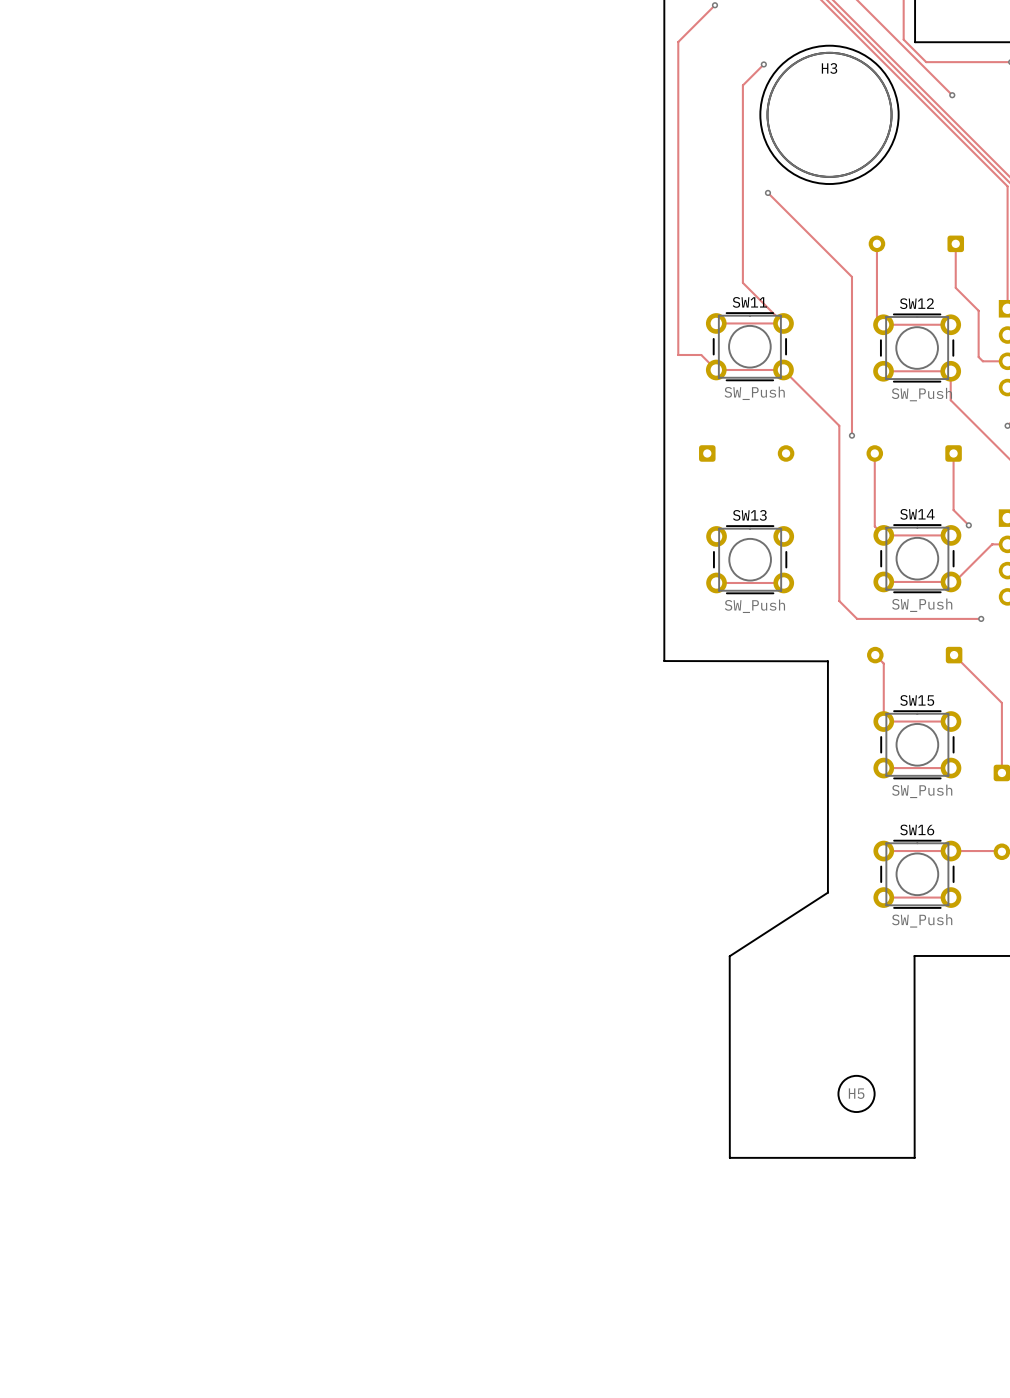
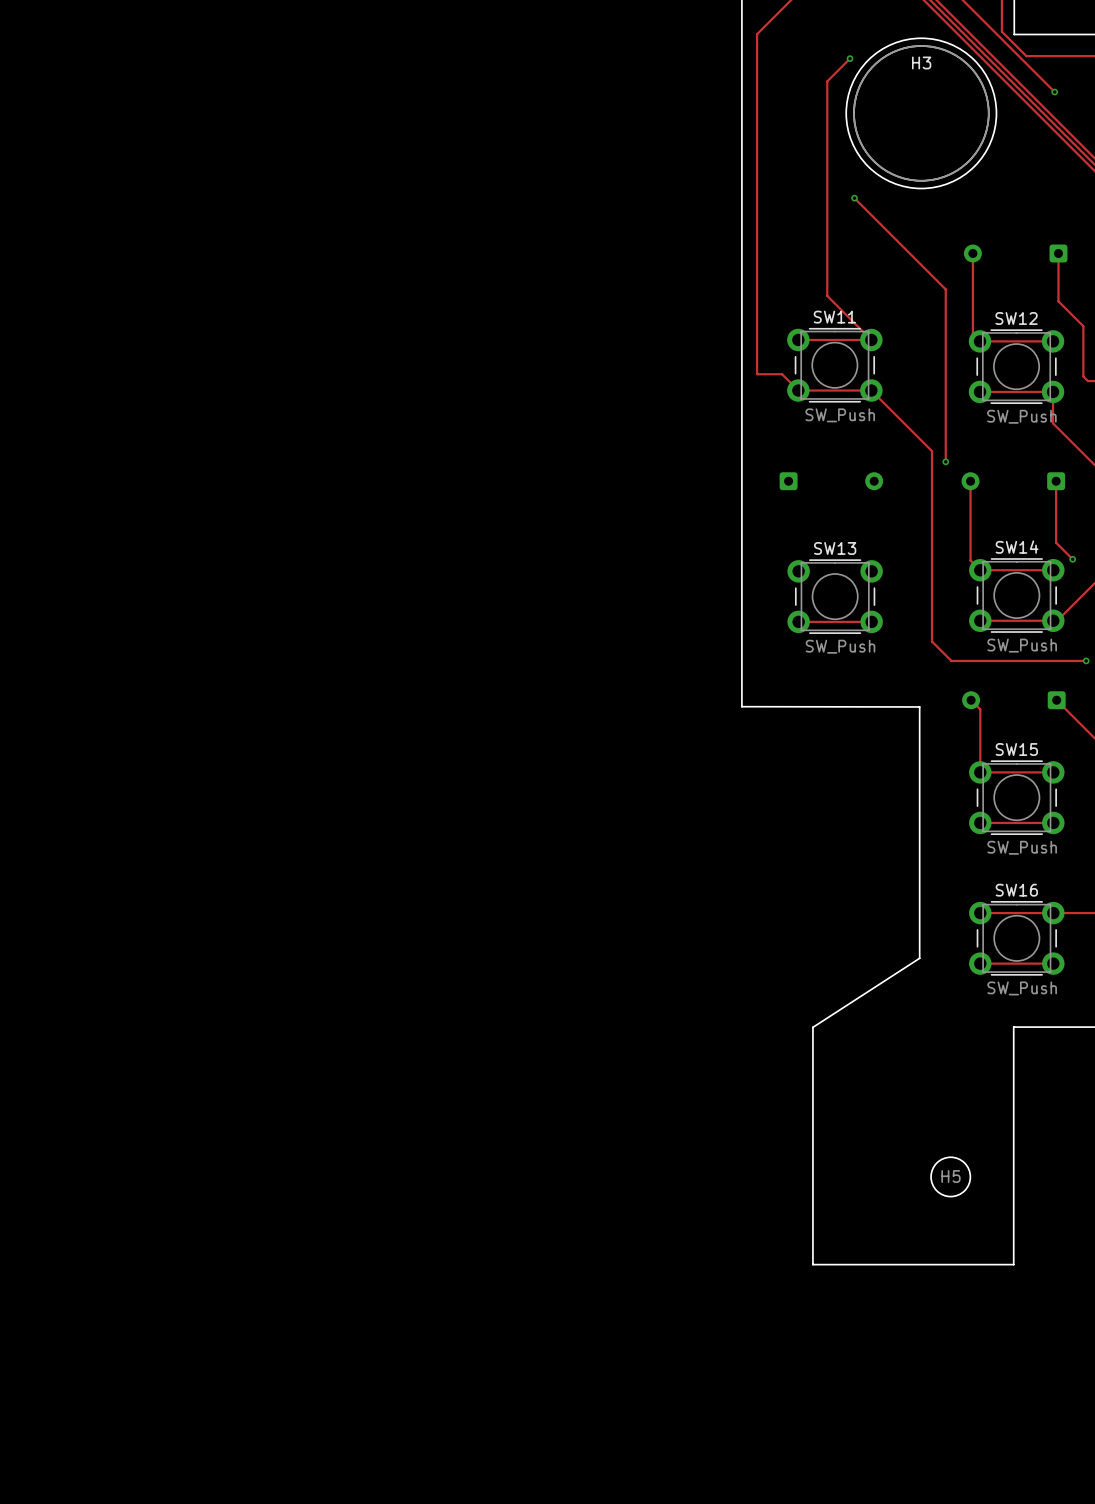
board edge: (914, 955) (914, 1157) (729, 1157) (729, 956) -> (1013, 1027) (1013, 1264) (812, 1264)
board edge: none -> (812, 1027) (812, 1264)

